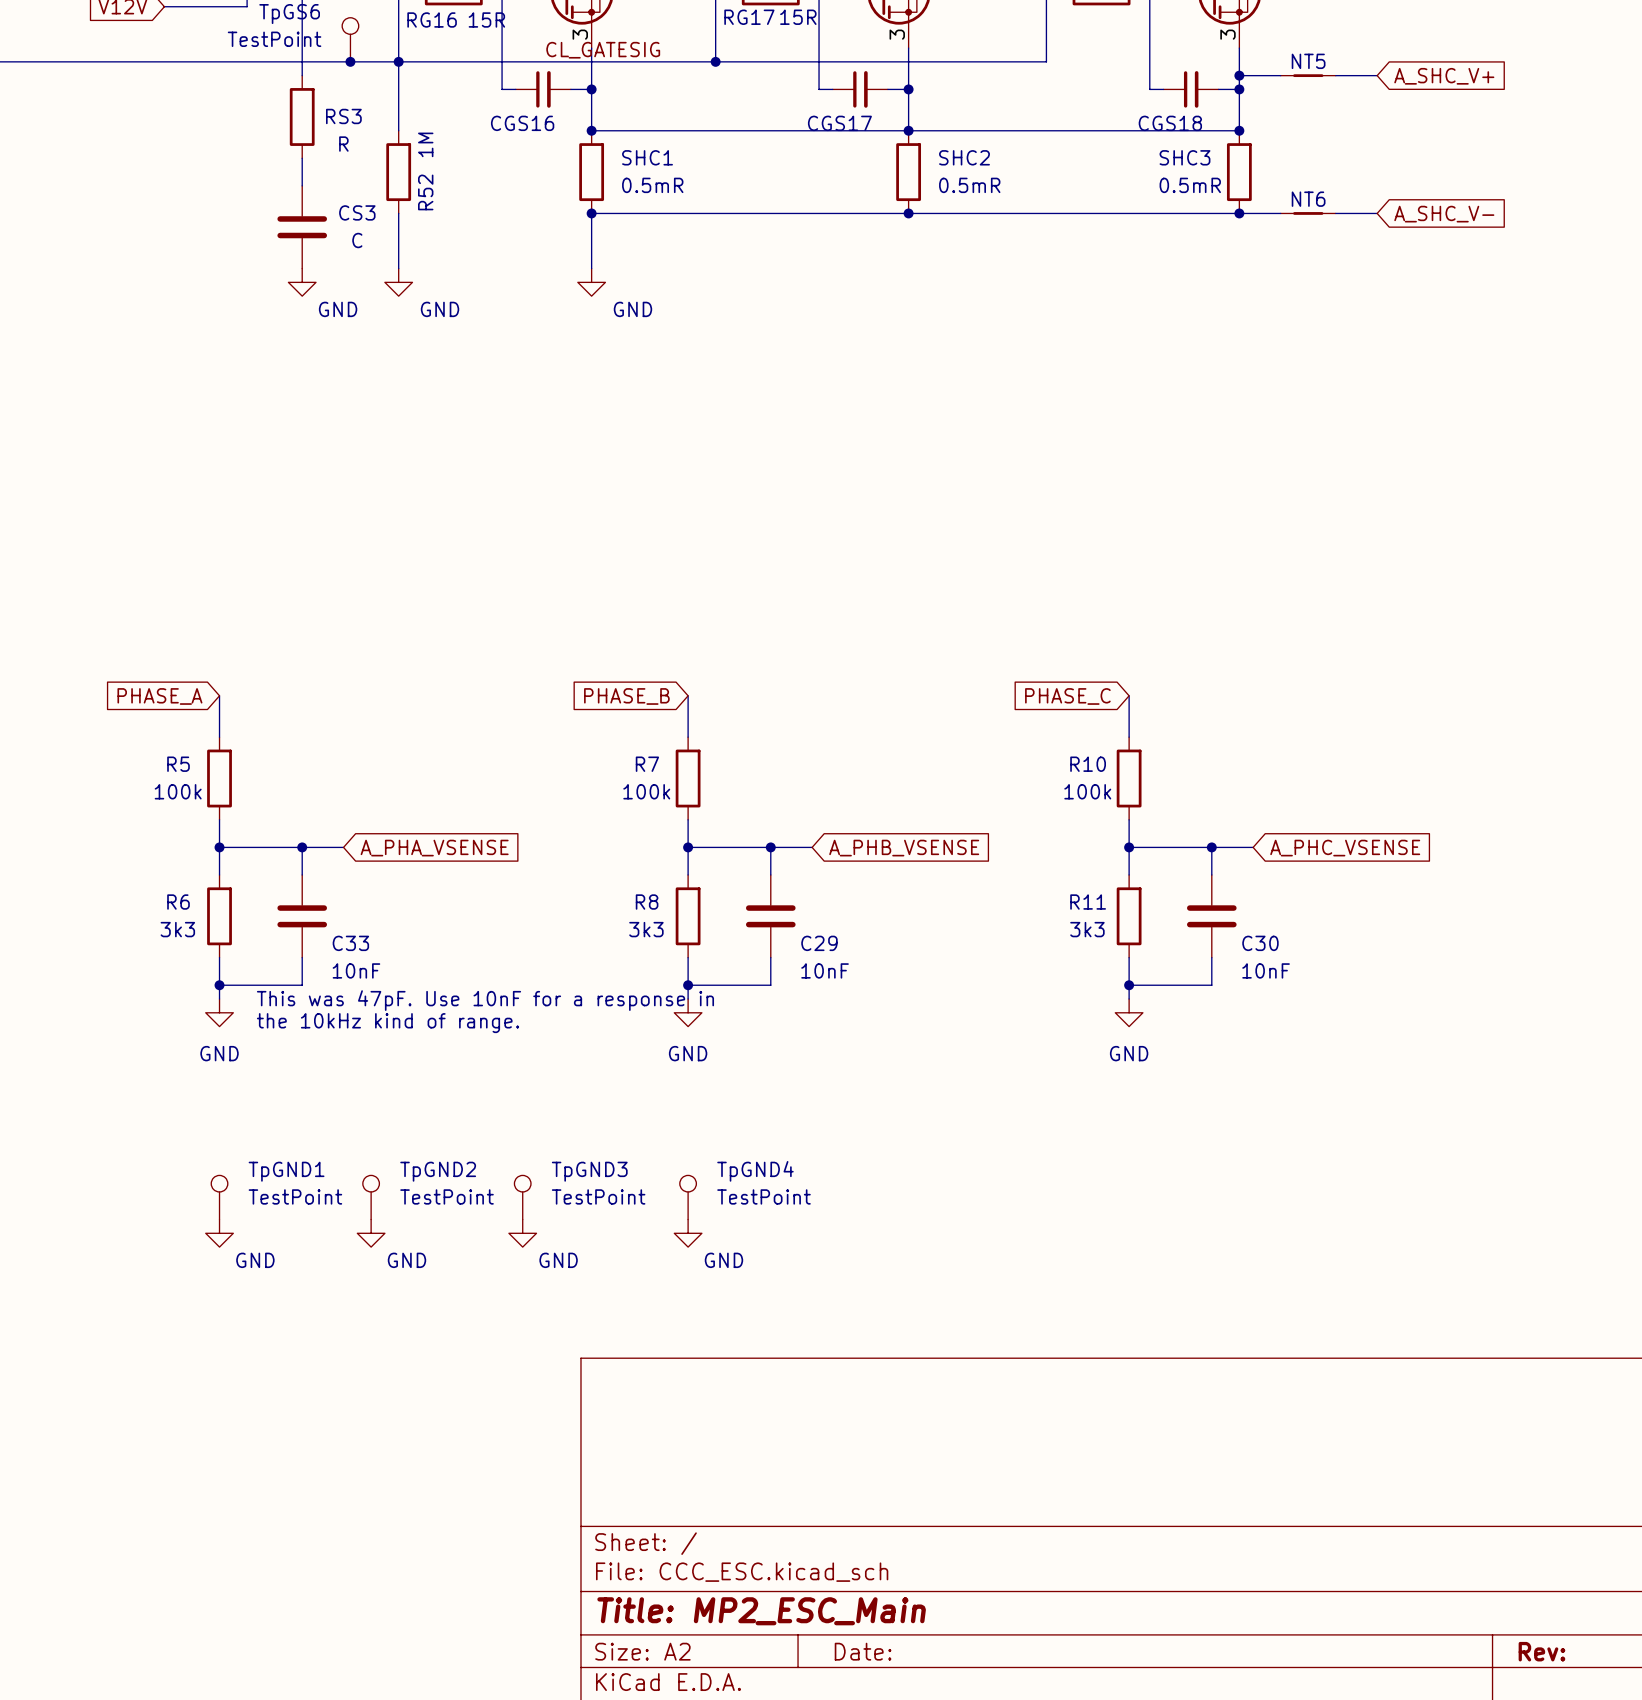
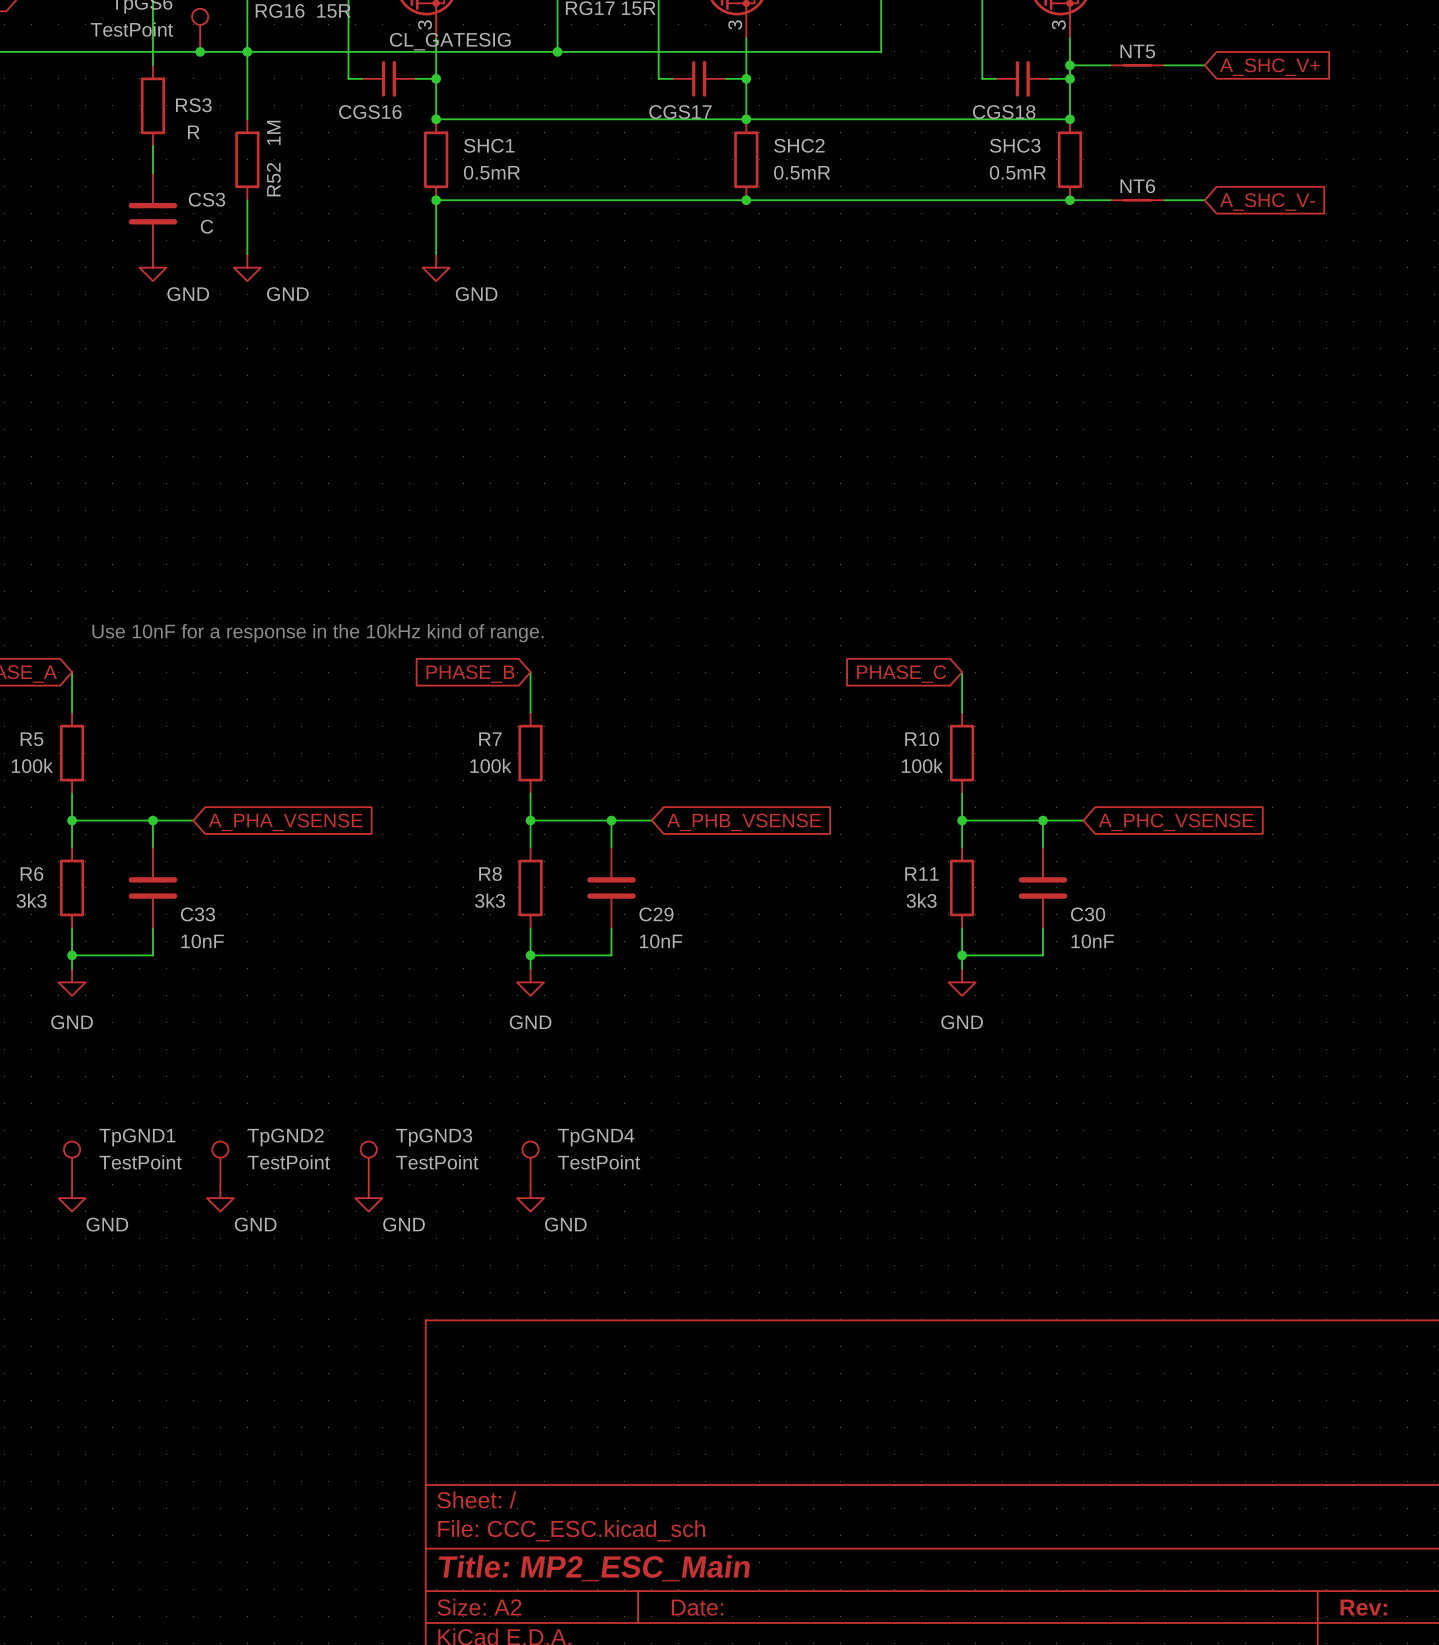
text: none -> Use 10nF for a response in the 10kHz kind of range. (317, 633)
text: This was 47pF. Use 10nF for a response in (485, 1000) -> none
text: the 10kHz kind of range. (388, 1023) -> none

